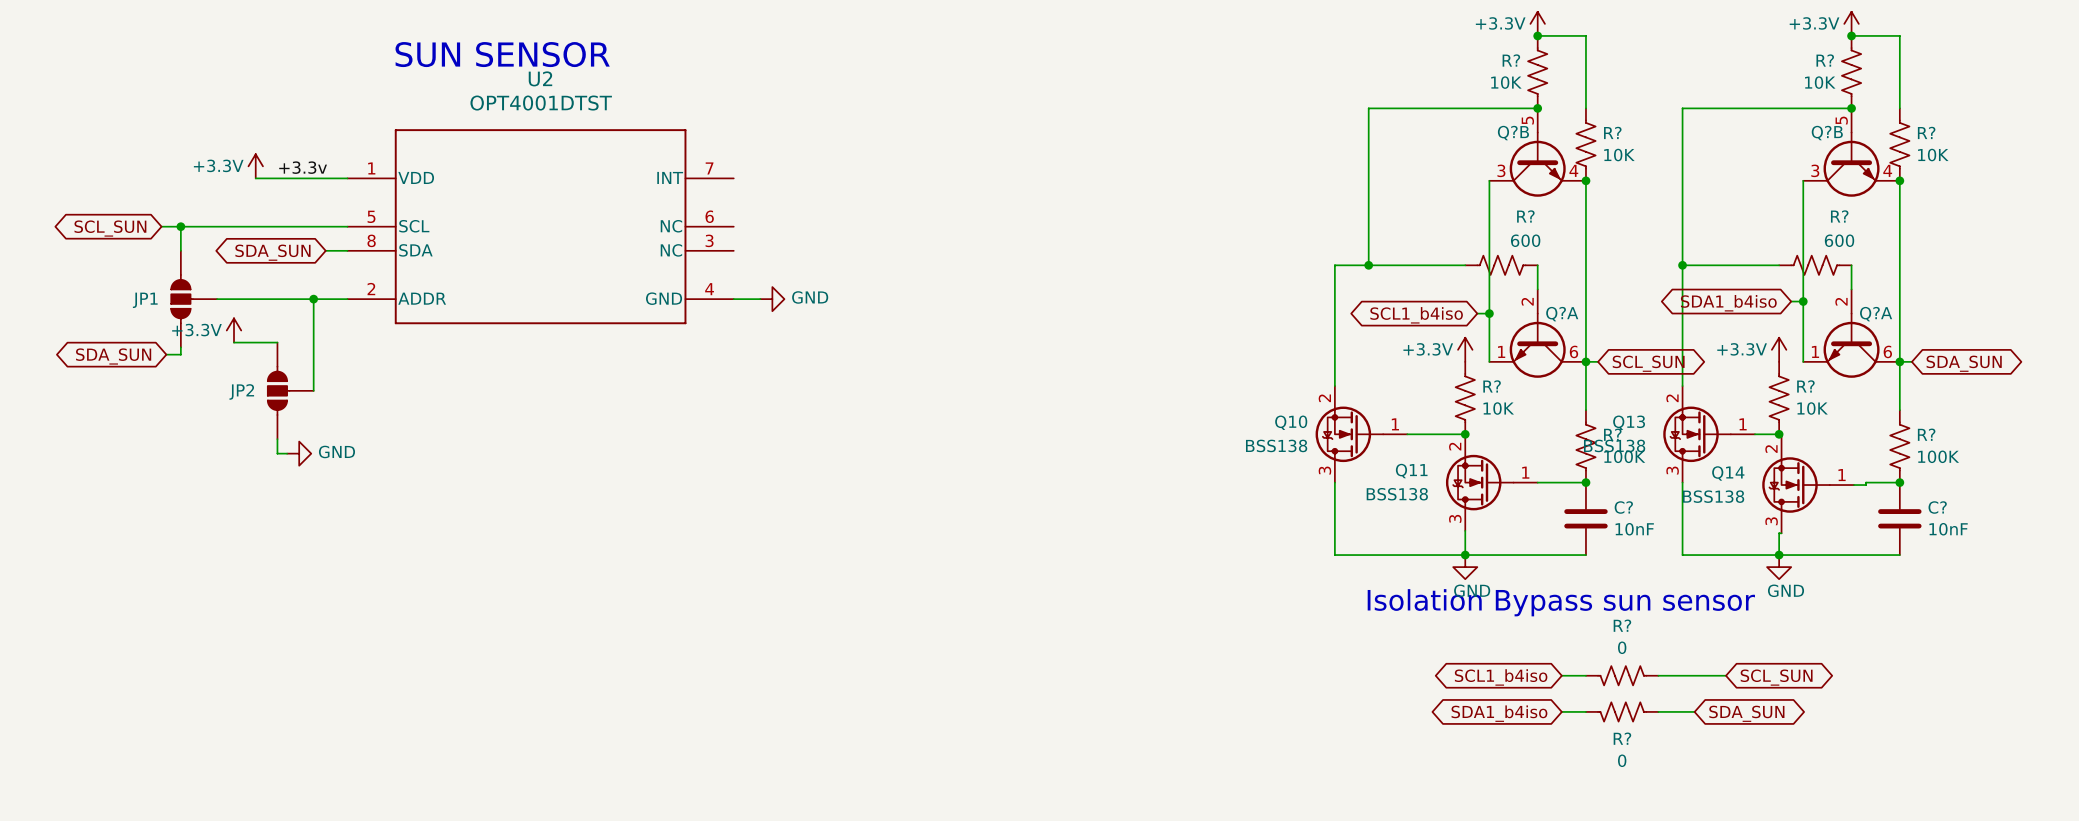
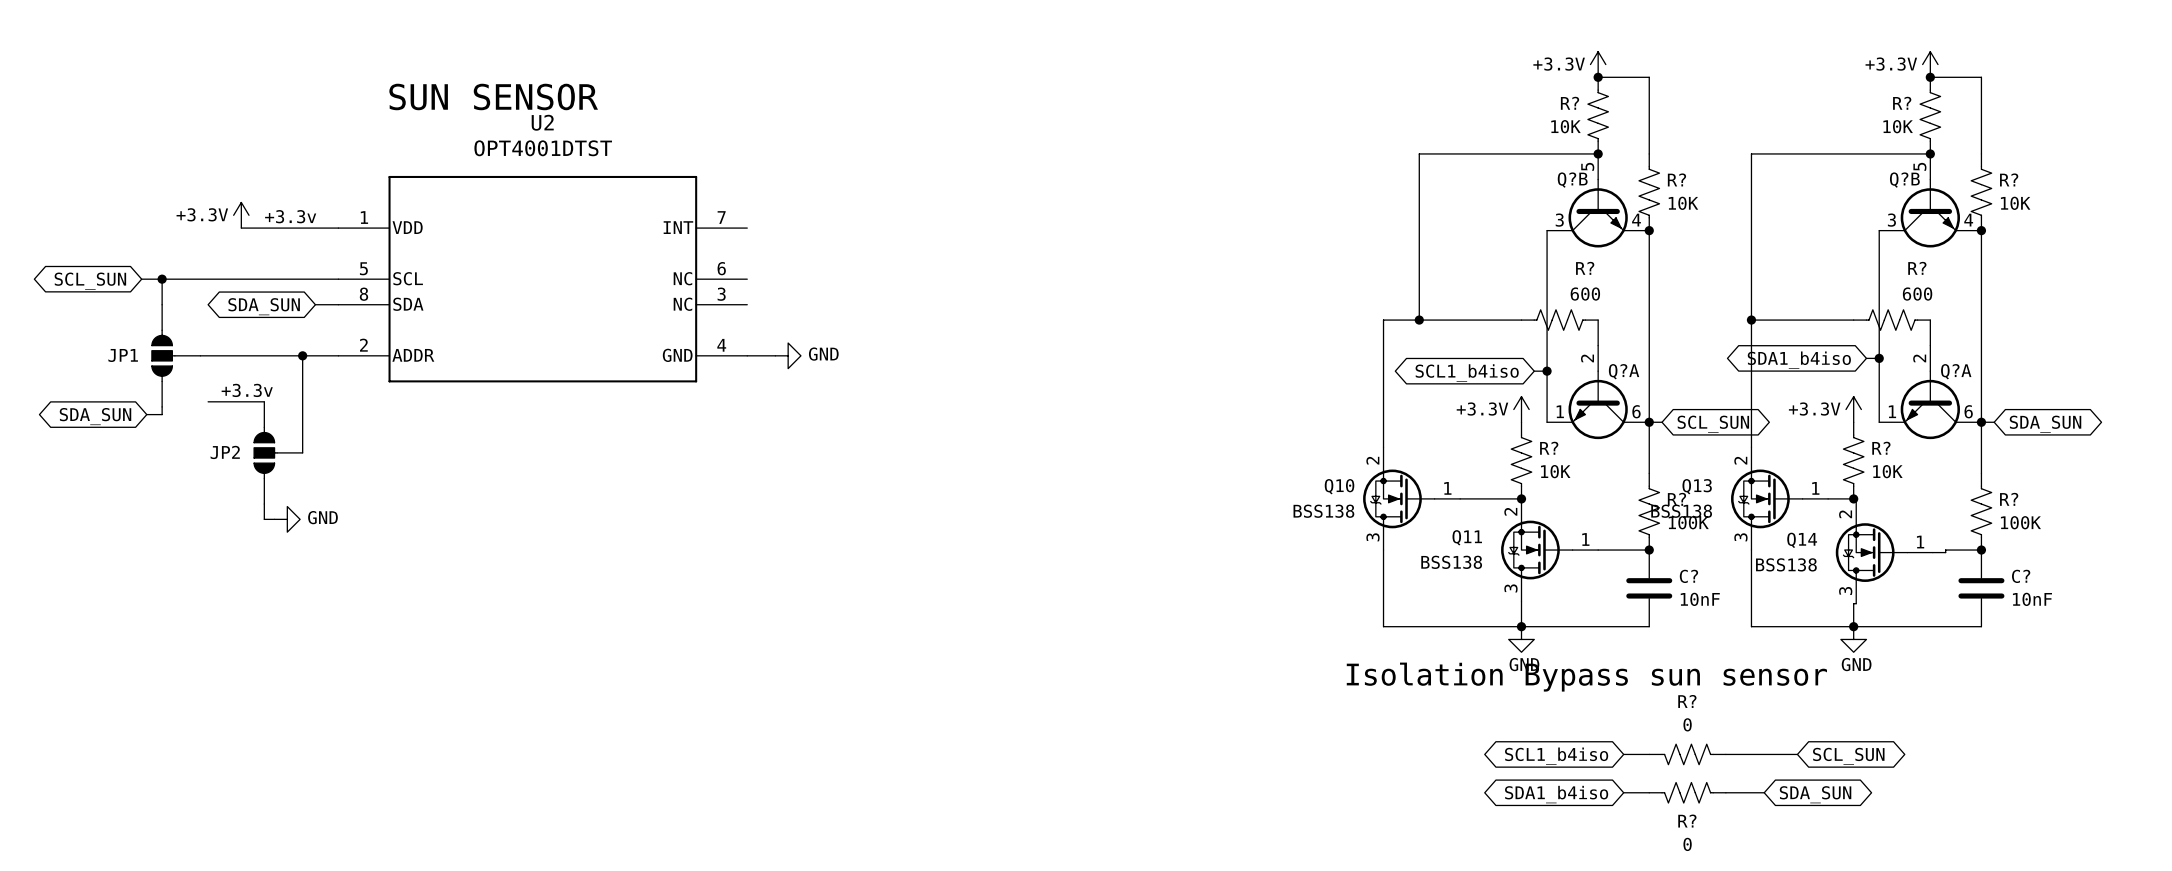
power symbol: +3.3V (234, 330) -> none
label: none -> +3.3v (247, 390)
wire: none -> (208, 401) (218, 401)

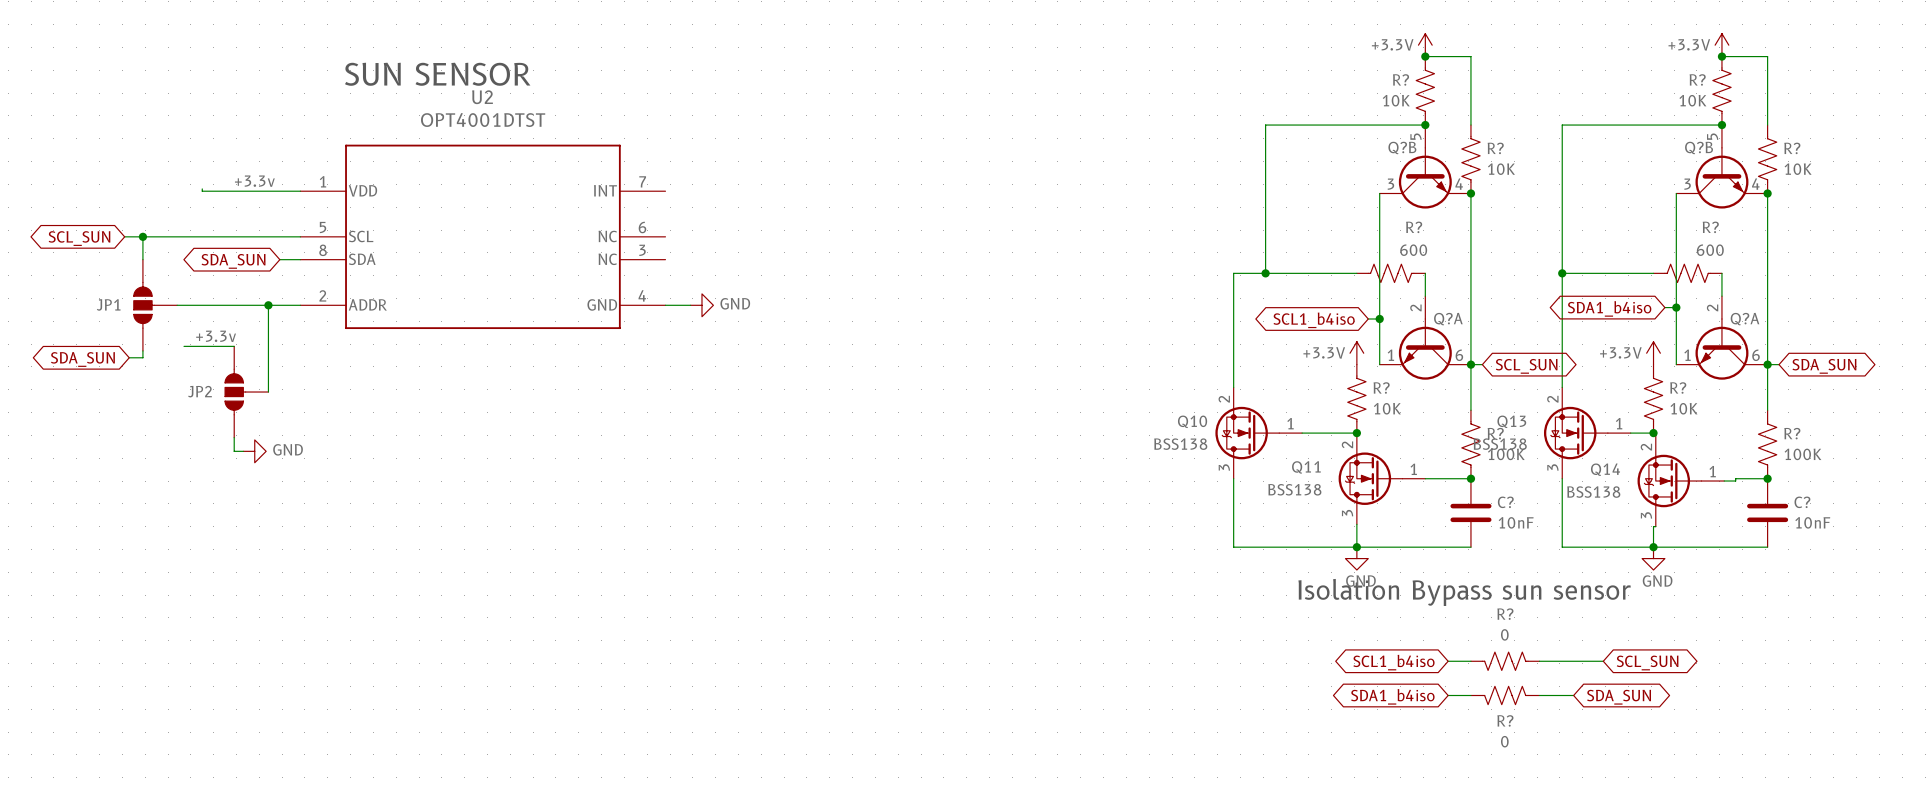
power symbol: +3.3V (241, 215) -> none
wire: none -> (202, 188) (202, 191) (213, 191)

